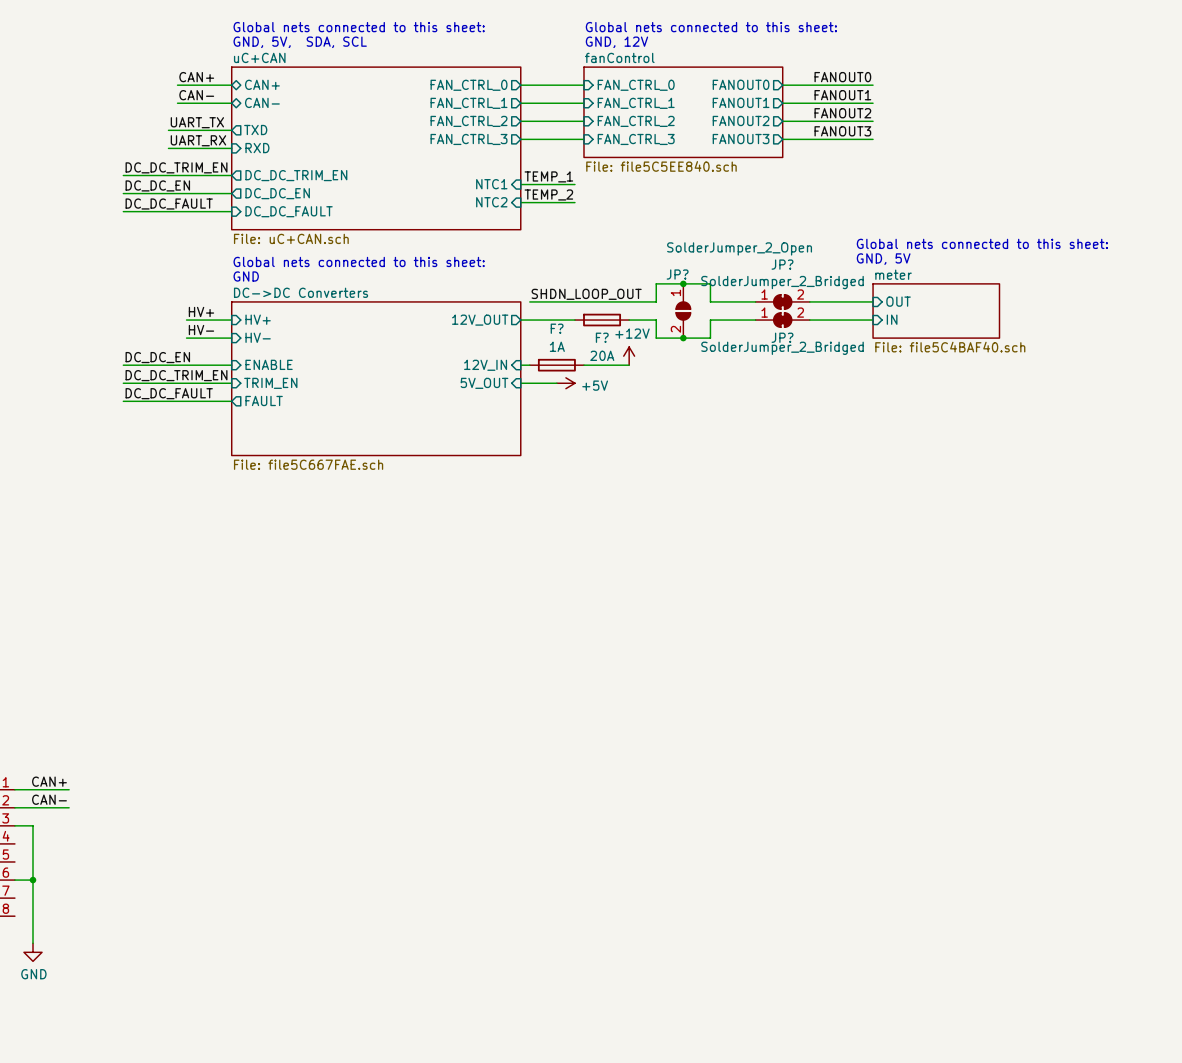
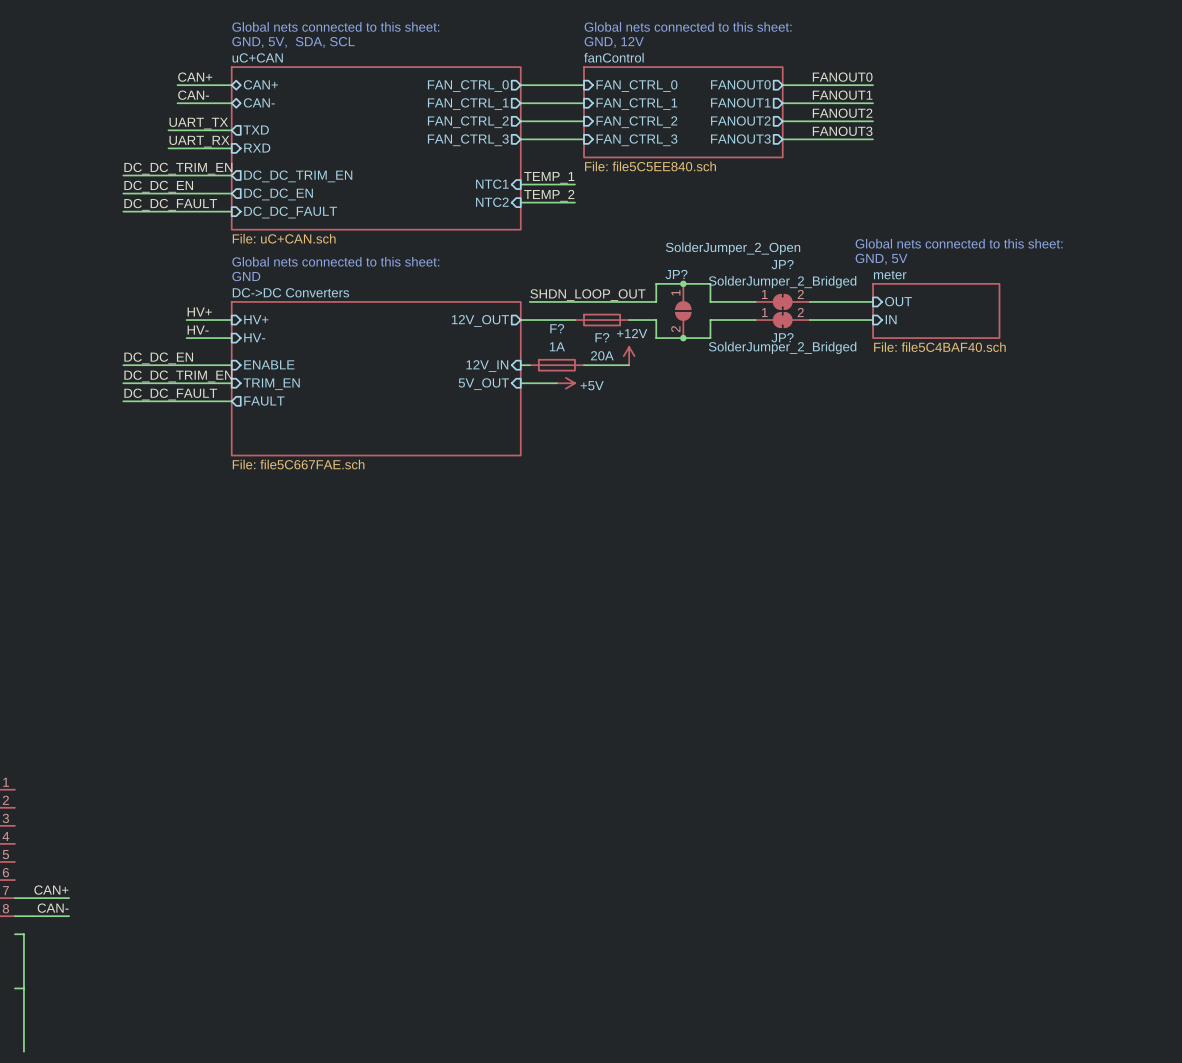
label position: CAN+ (49, 781) -> CAN+ (51, 890)
wire: (14, 789) (69, 789) -> (14, 898) (69, 898)
label position: CAN- (49, 799) -> CAN- (53, 908)
wire: (14, 807) (69, 807) -> (14, 916) (69, 916)
wire: (14, 825) (33, 825) (33, 943) -> none
wire: (14, 880) (33, 880) -> none
junction: (33, 880) -> none
wire: none -> (14, 934) (23, 934) (23, 1051)
power symbol: GND (33, 952) -> none
wire: none -> (14, 988) (23, 988)

